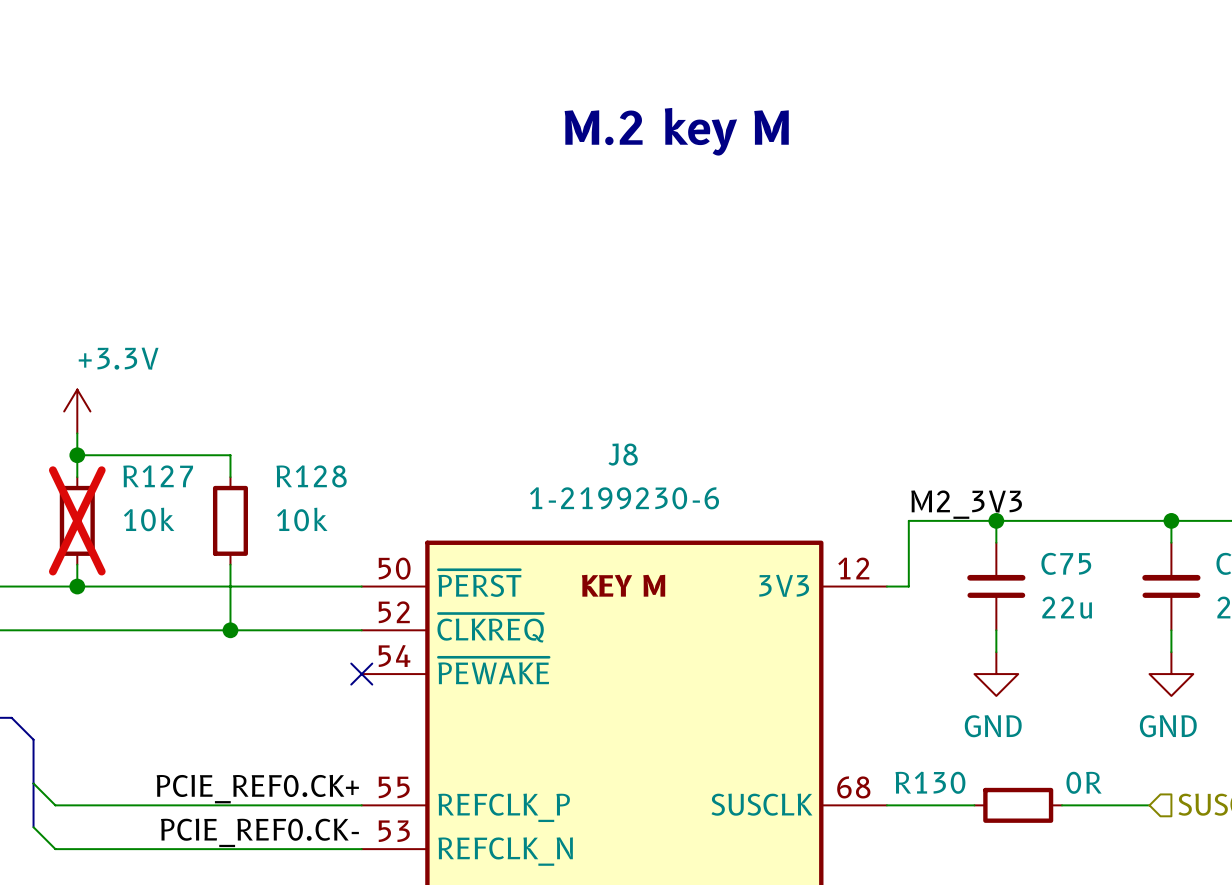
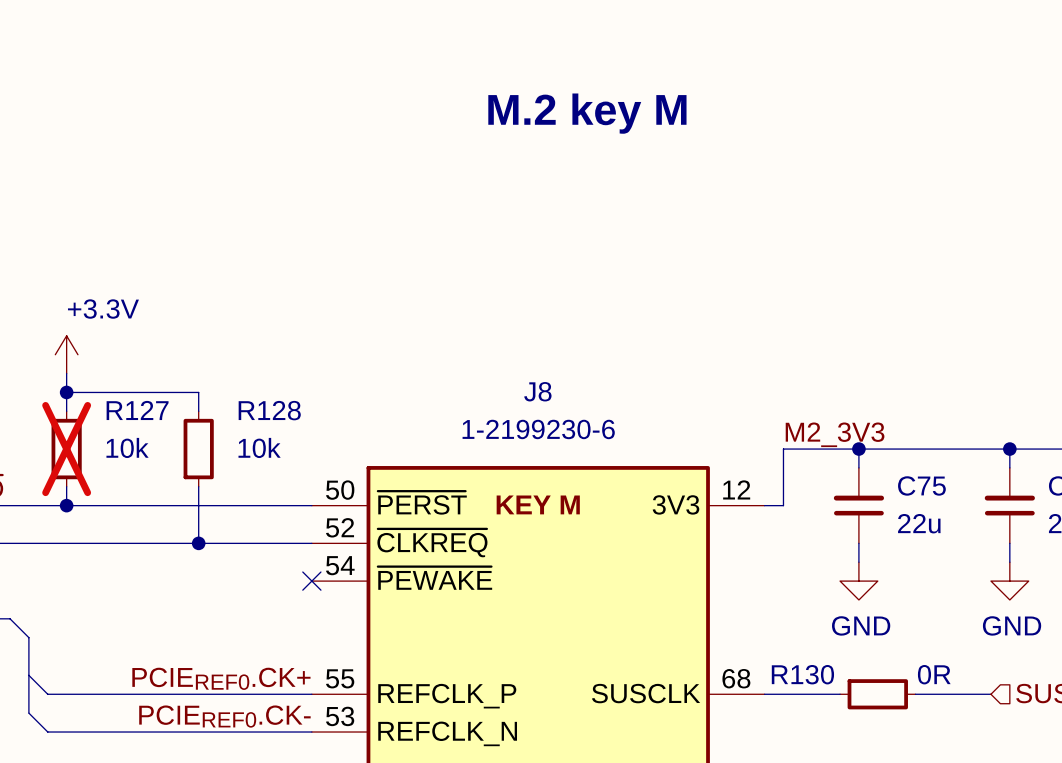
label: PCIE_REF0.CK+ (257, 789) -> PCIEREF0.CK+ (221, 678)
label: PCIE_REF0.CK- (259, 832) -> PCIEREF0.CK- (224, 716)

